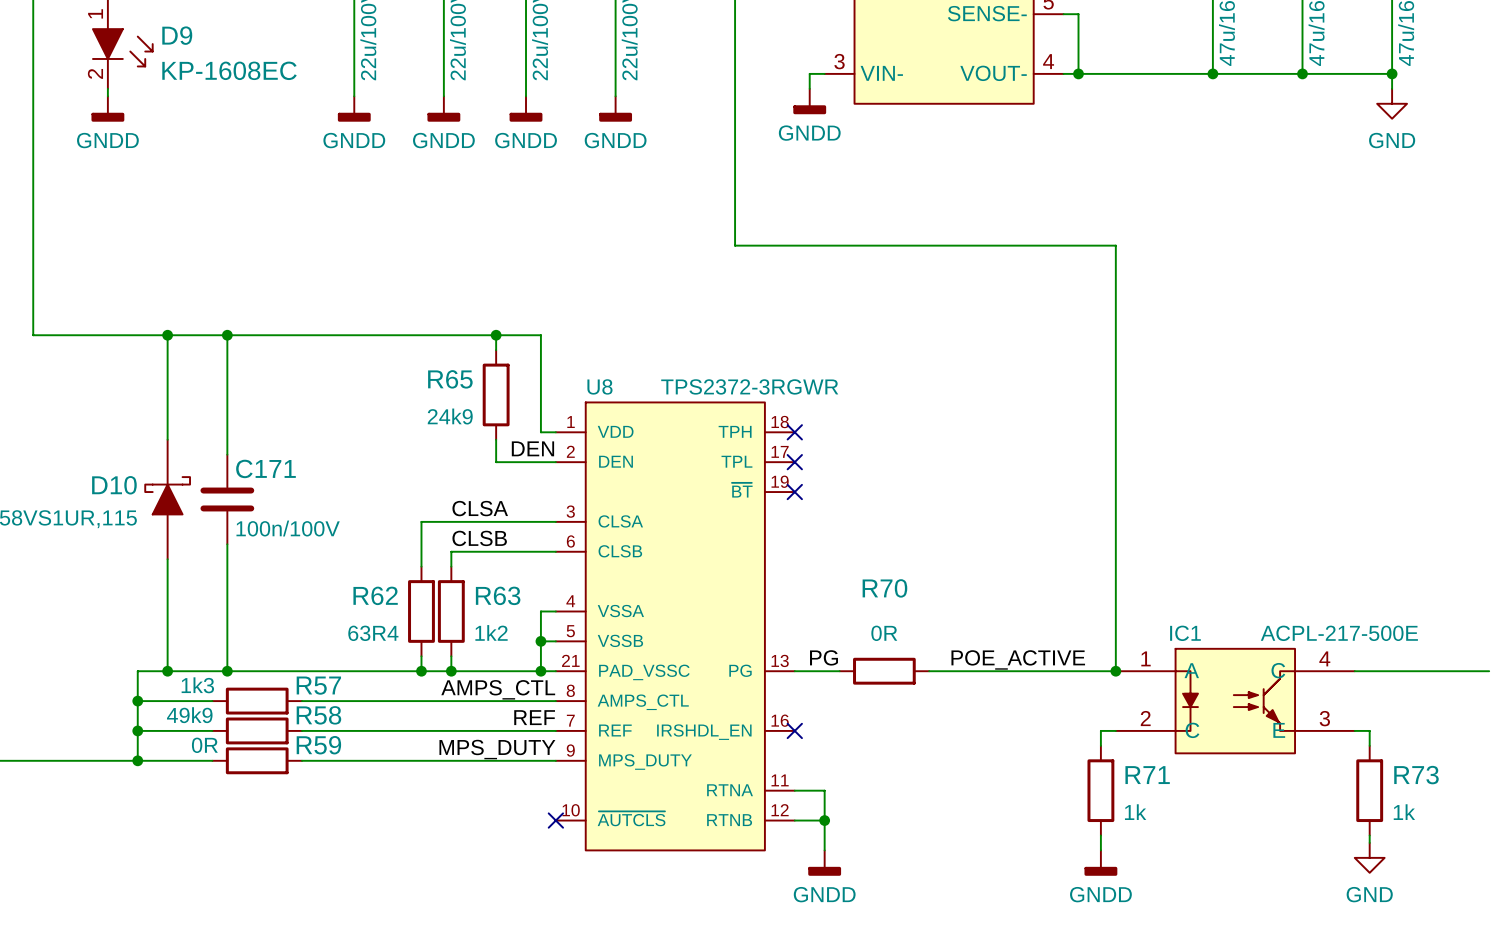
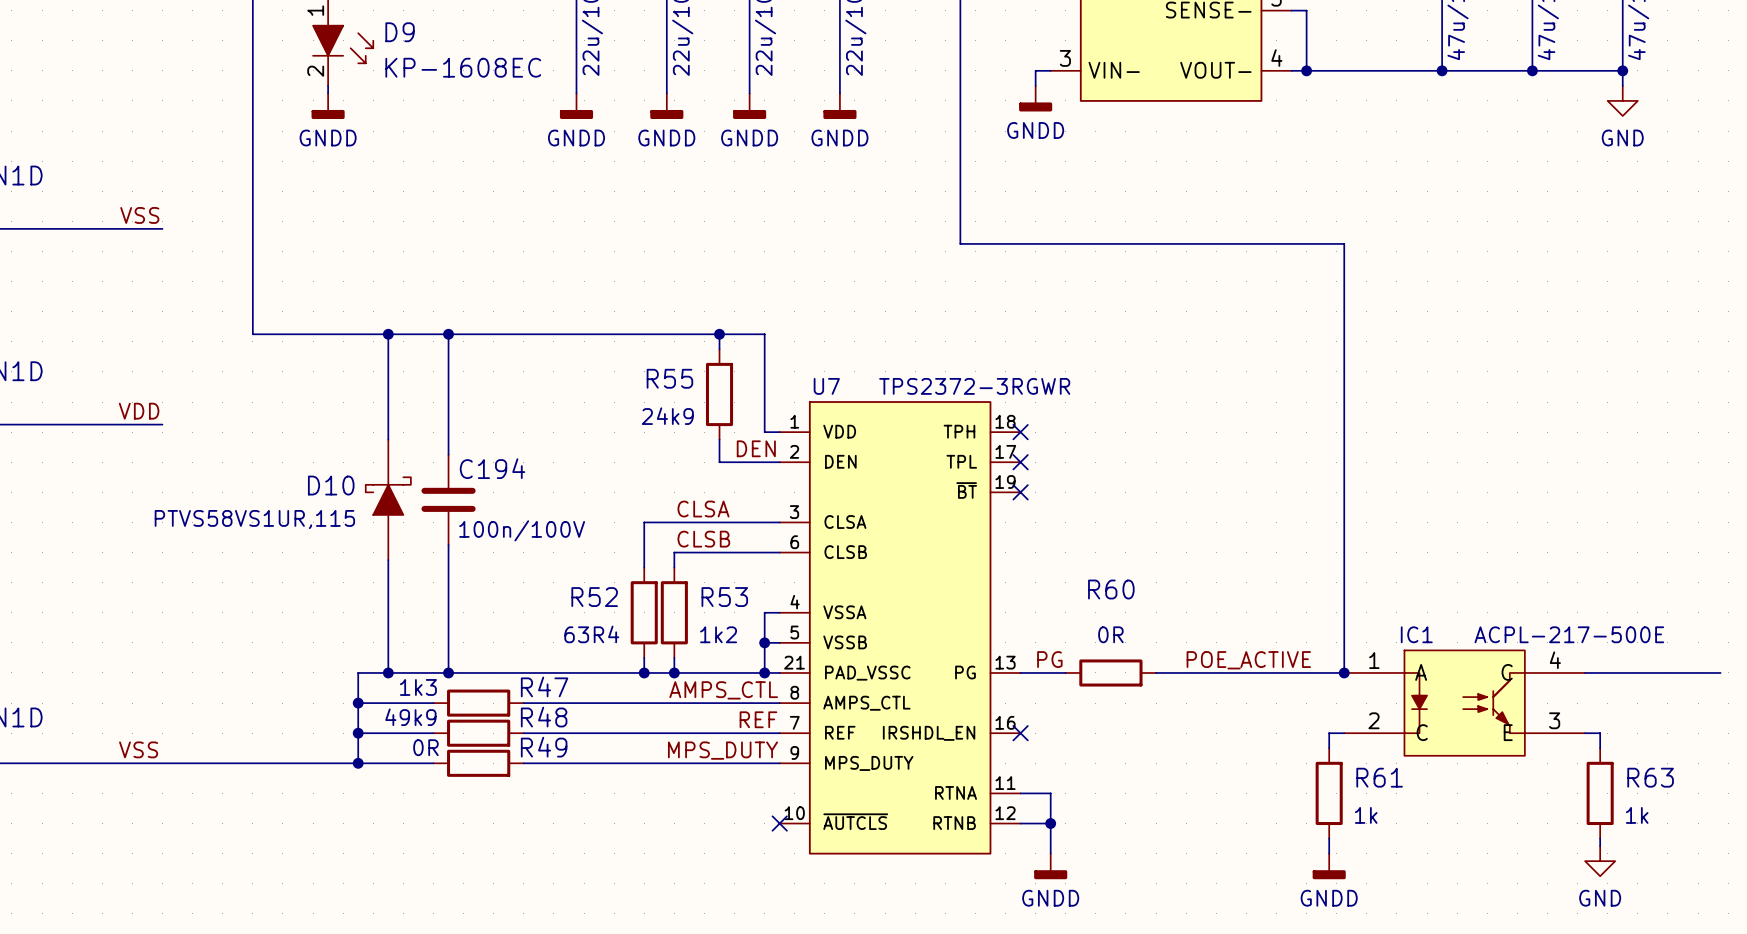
R65 name: R65 (450, 379) -> R55 (669, 378)
U8 name: U8 (599, 386) -> U7 (826, 386)
C171 name: C171 (265, 468) -> C194 (492, 468)
R70 name: R70 (884, 588) -> R60 (1111, 589)
R62 name: R62 (375, 595) -> R52 (594, 597)
R63 name: R63 (498, 595) -> R53 (724, 597)
R57 name: R57 (318, 685) -> R47 (544, 686)
R58 name: R58 (318, 715) -> R48 (544, 717)
R59 name: R59 (318, 745) -> R49 (544, 747)
R71 name: R71 (1147, 775) -> R61 (1379, 777)
R73 name: R73 (1416, 775) -> R63 (1650, 777)

